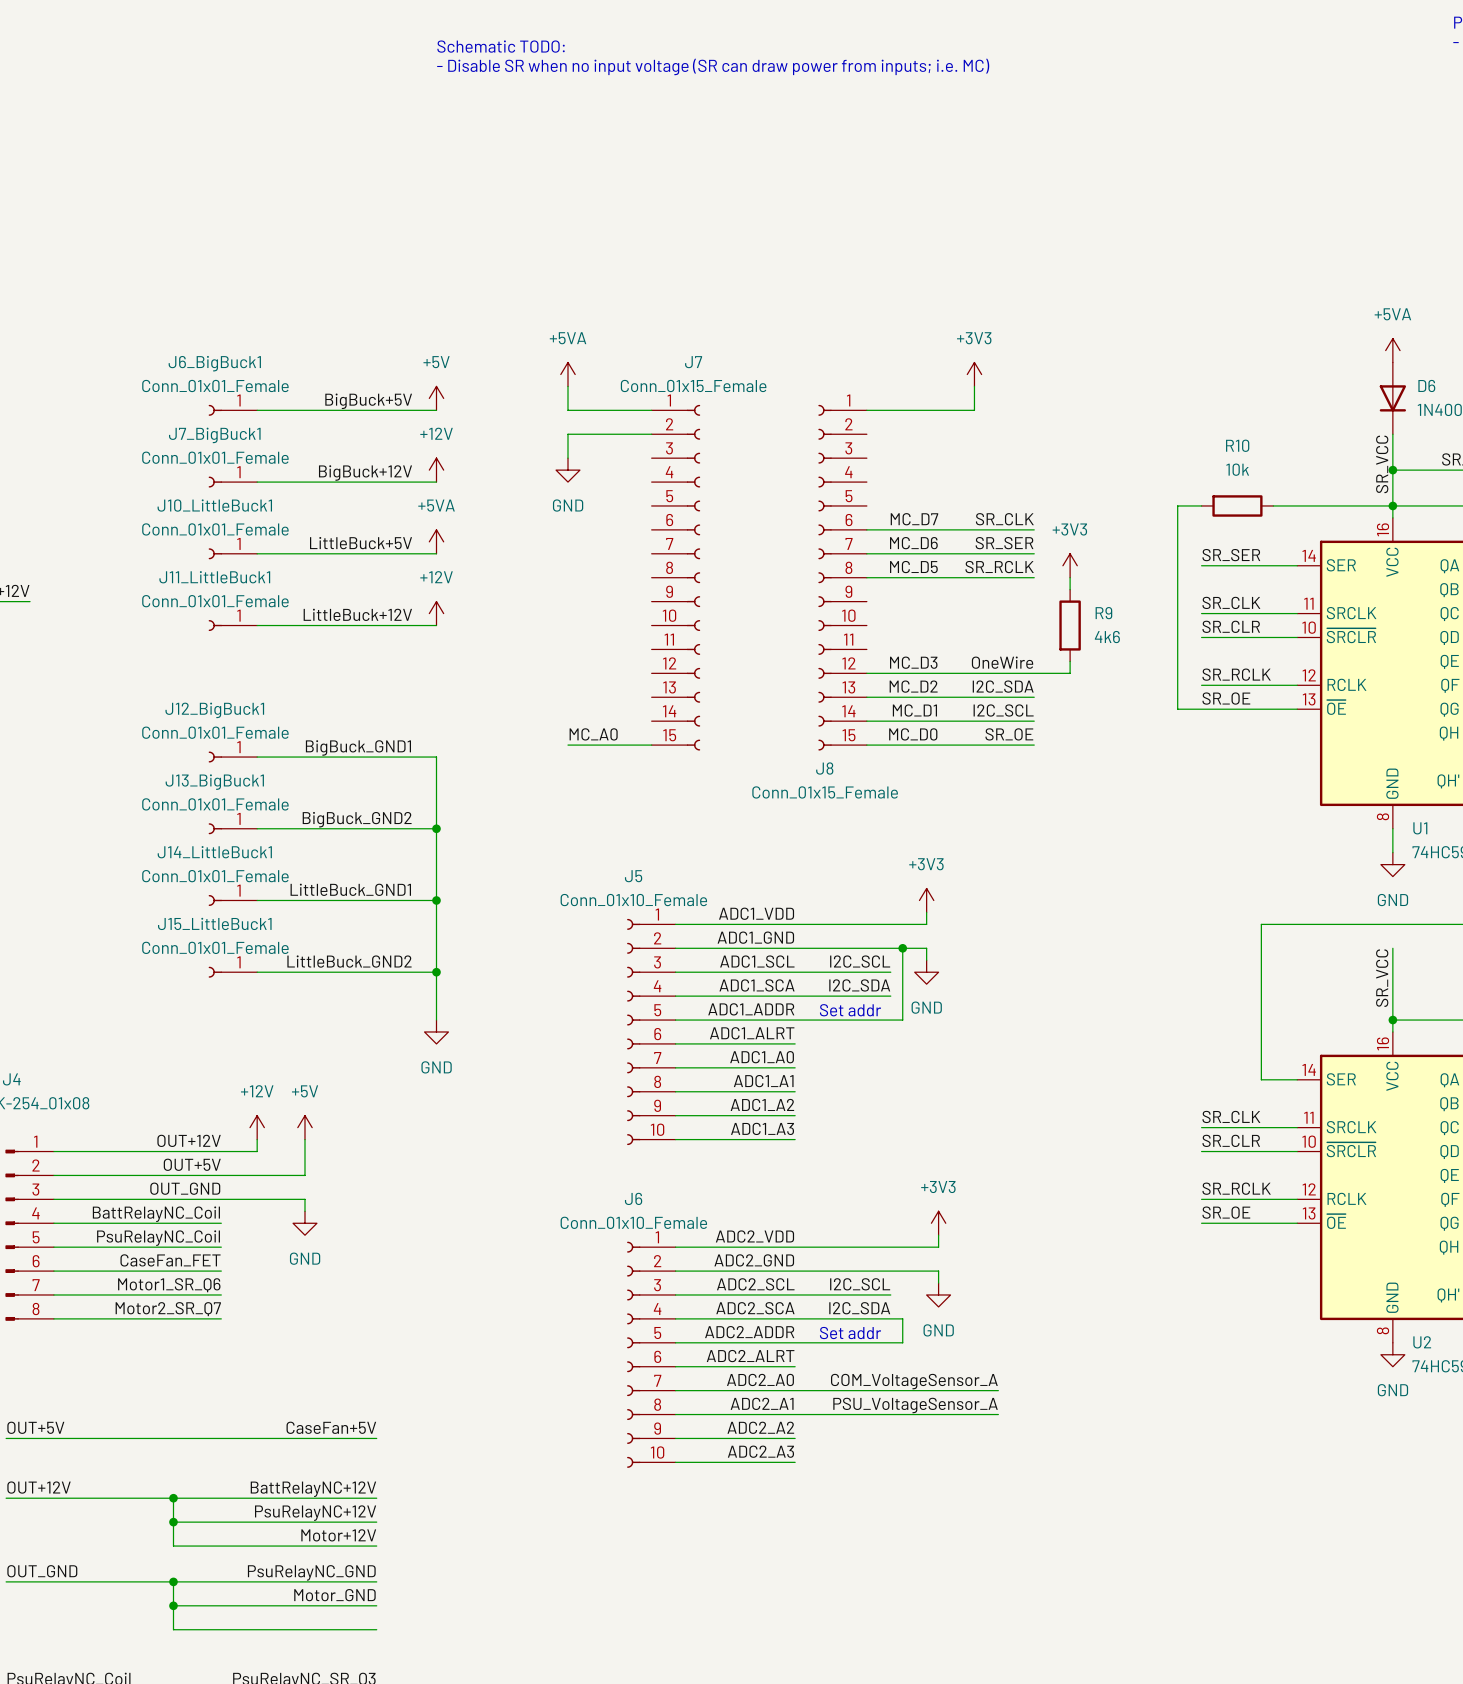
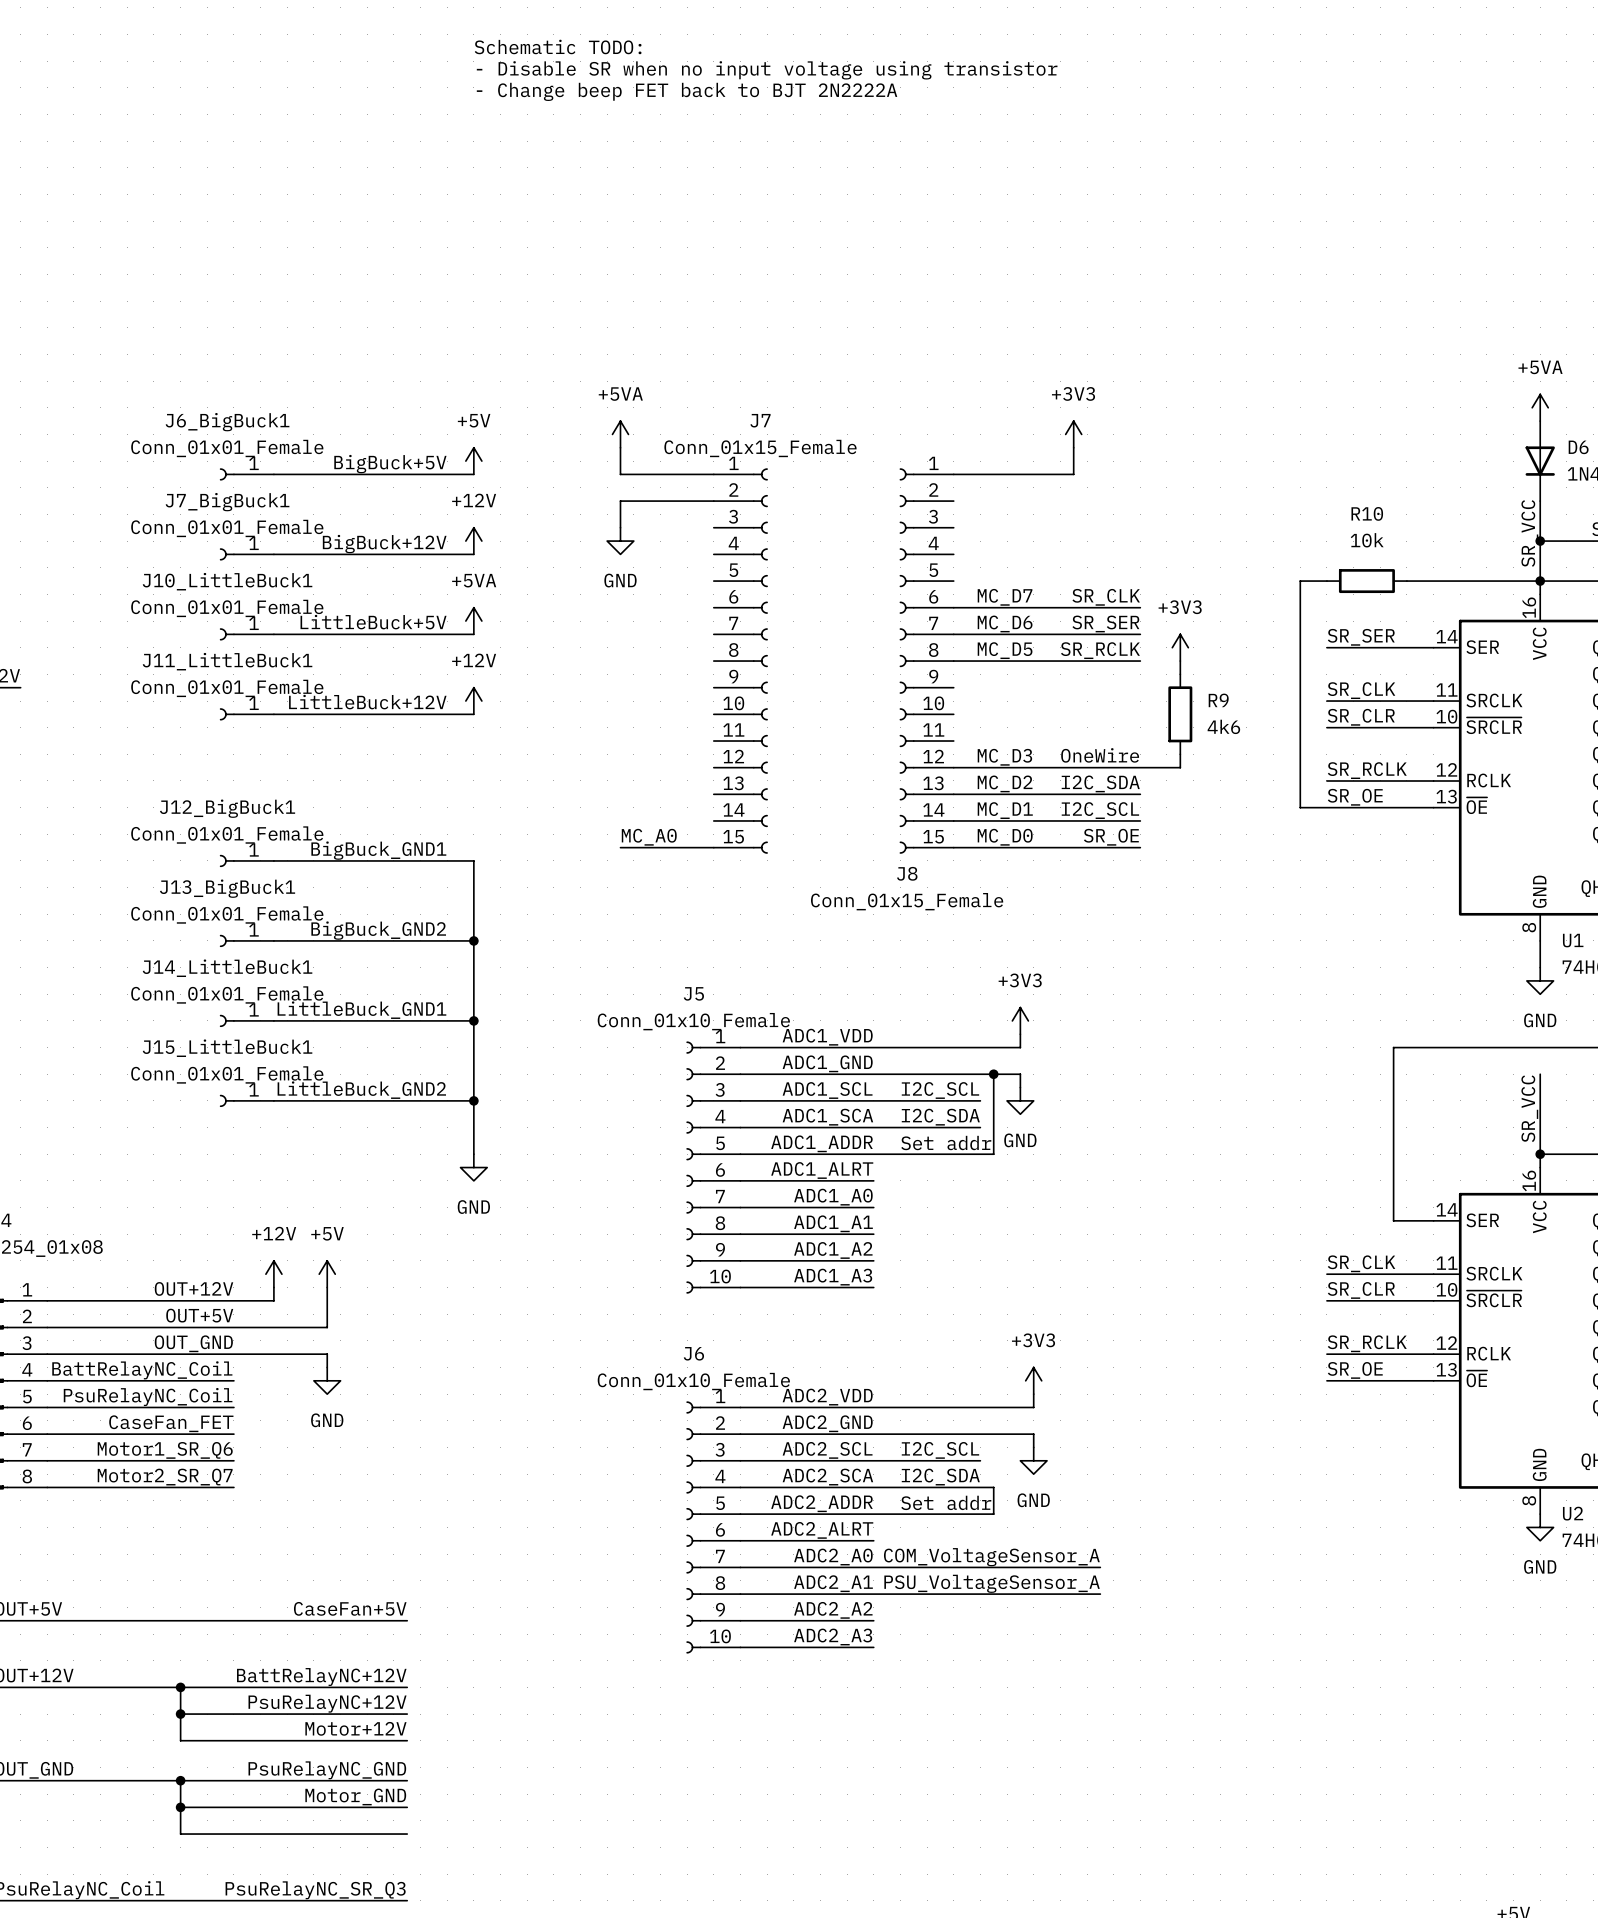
text: none -> Schematic TODO: (558, 46)
text: Schematic TODO: (501, 46) -> - Disable SR when no input voltage using transistor (767, 70)
text: - Disable SR when no input voltage (SR can draw power from inputs; i.e. MC) (713, 66) -> - Change beep FET back to BJT 2N2222A (687, 91)

